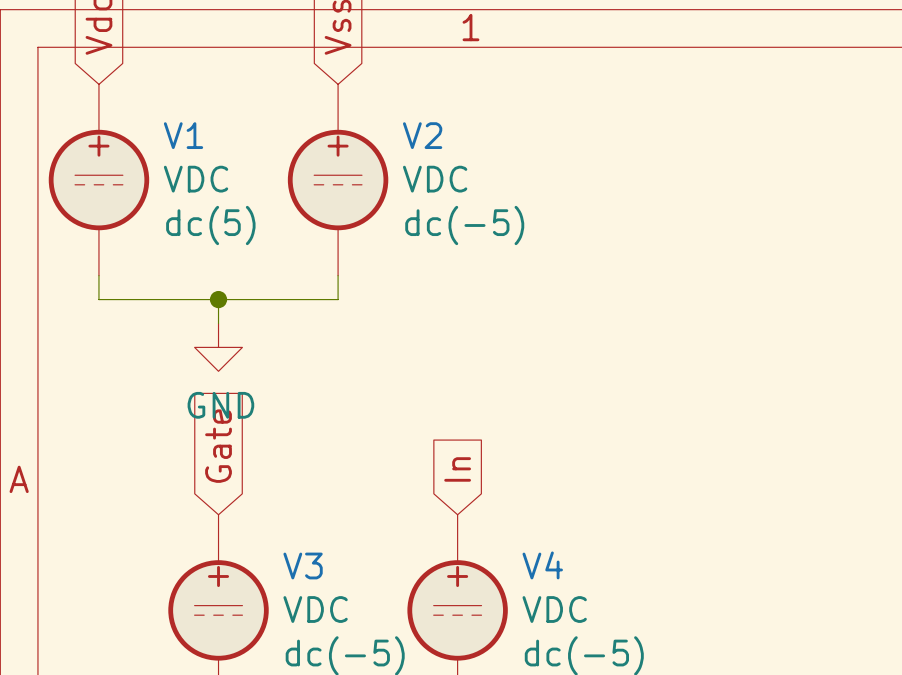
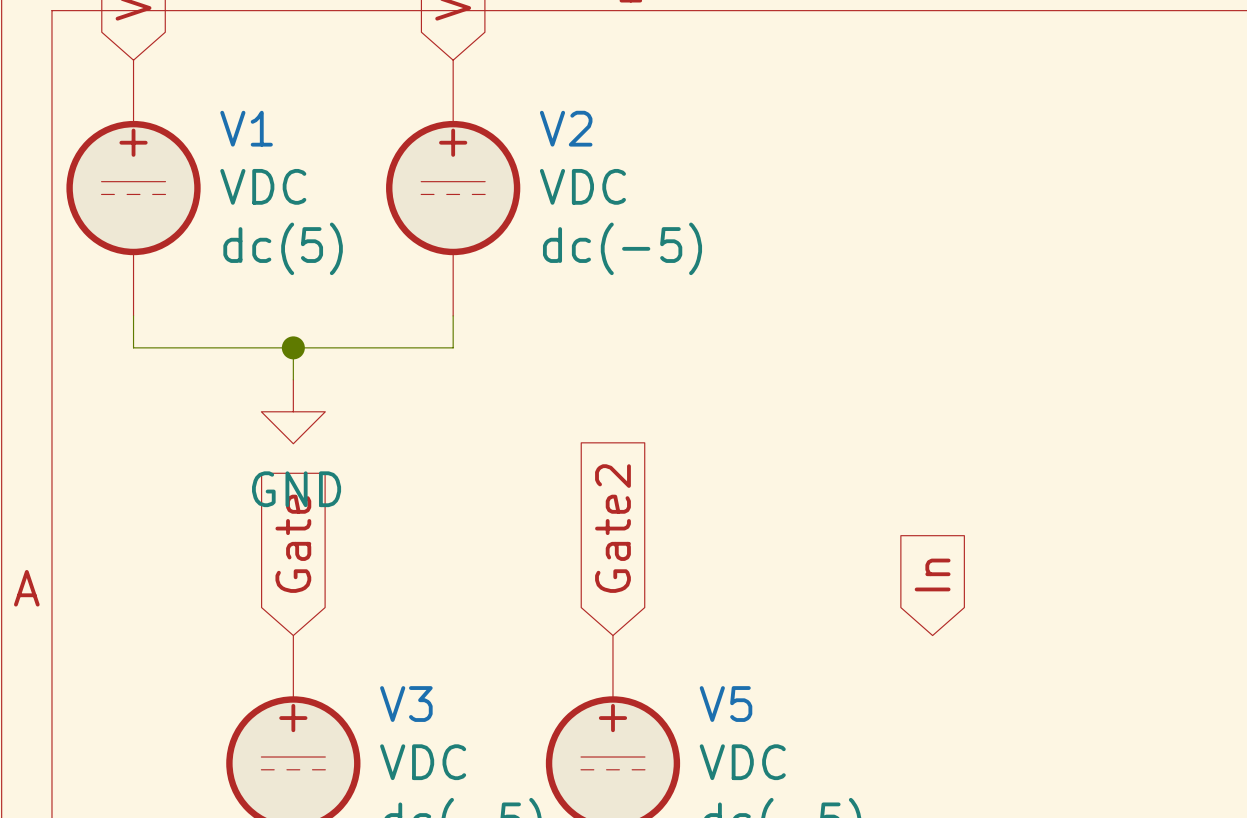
global label: In (457, 469) -> Gate2 (612, 528)
global label: none -> In (932, 574)
V4 name: V4 (542, 565) -> V5 (726, 704)

